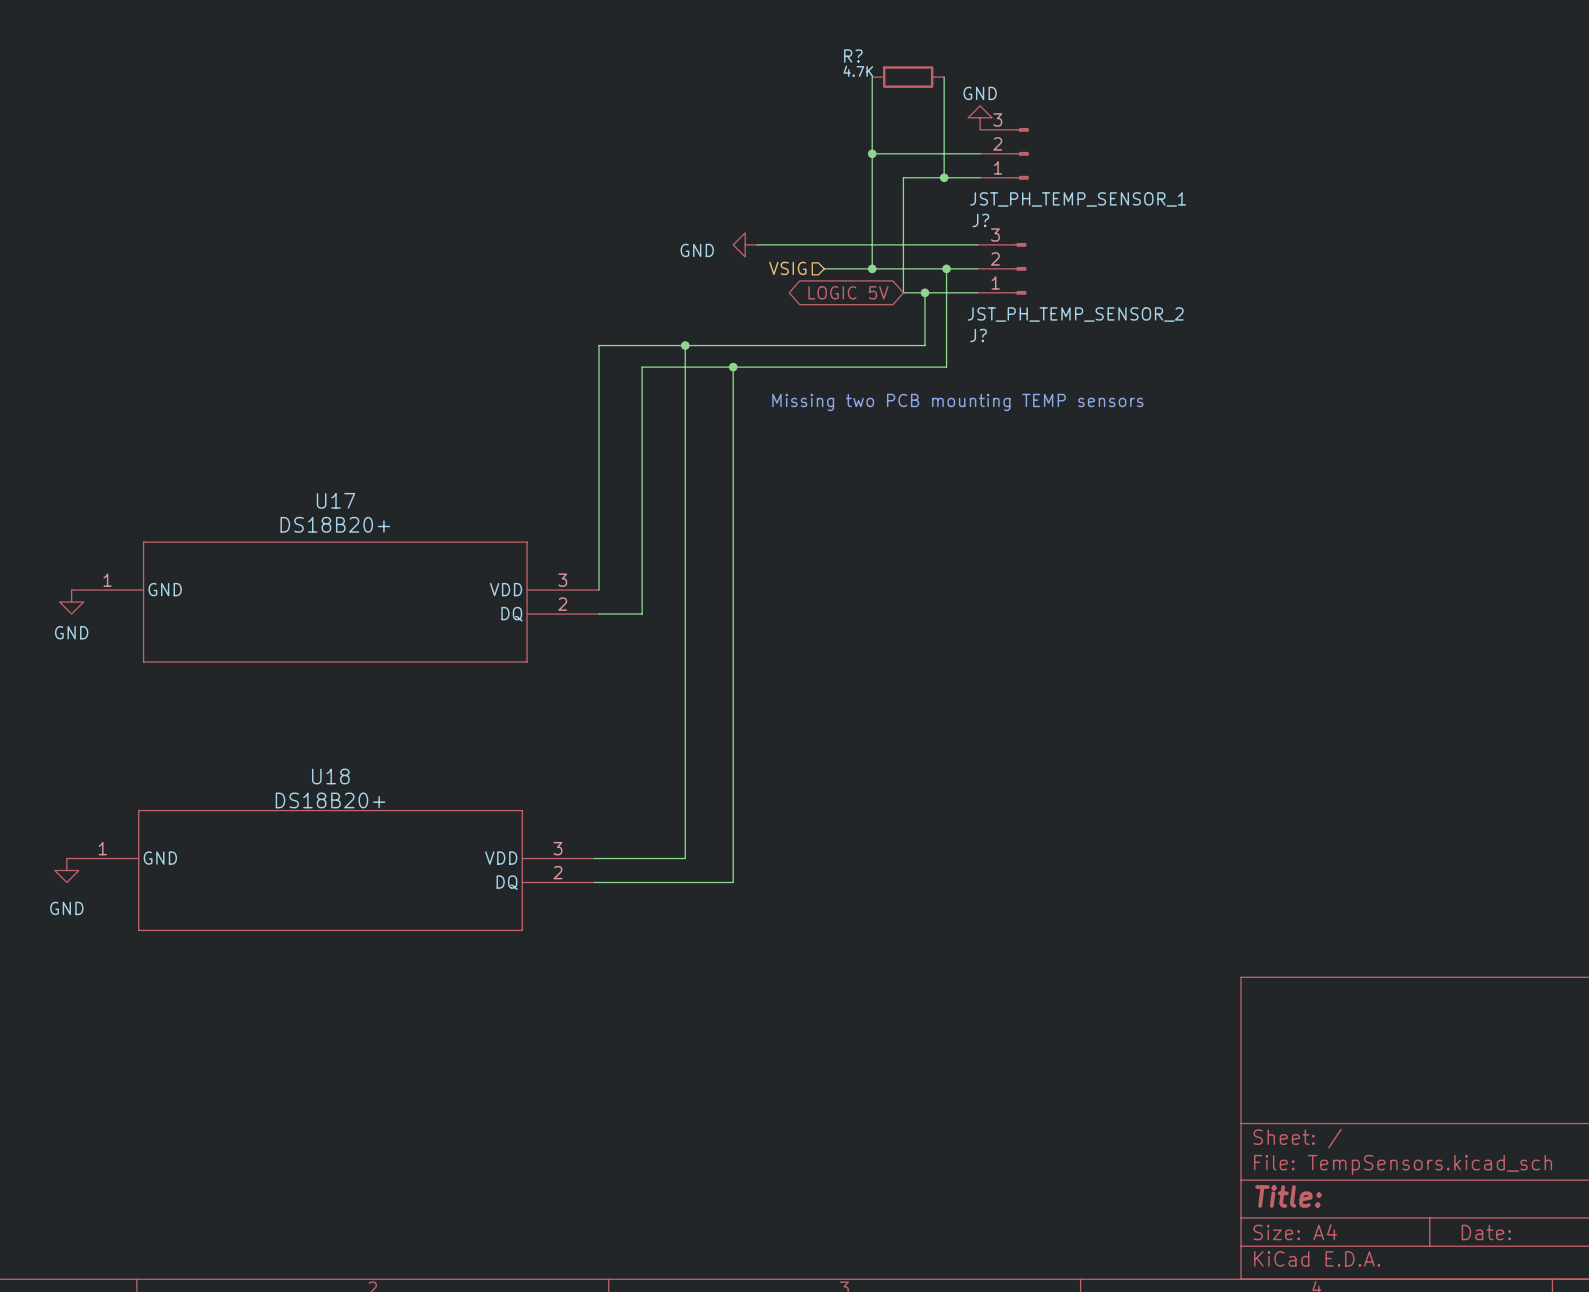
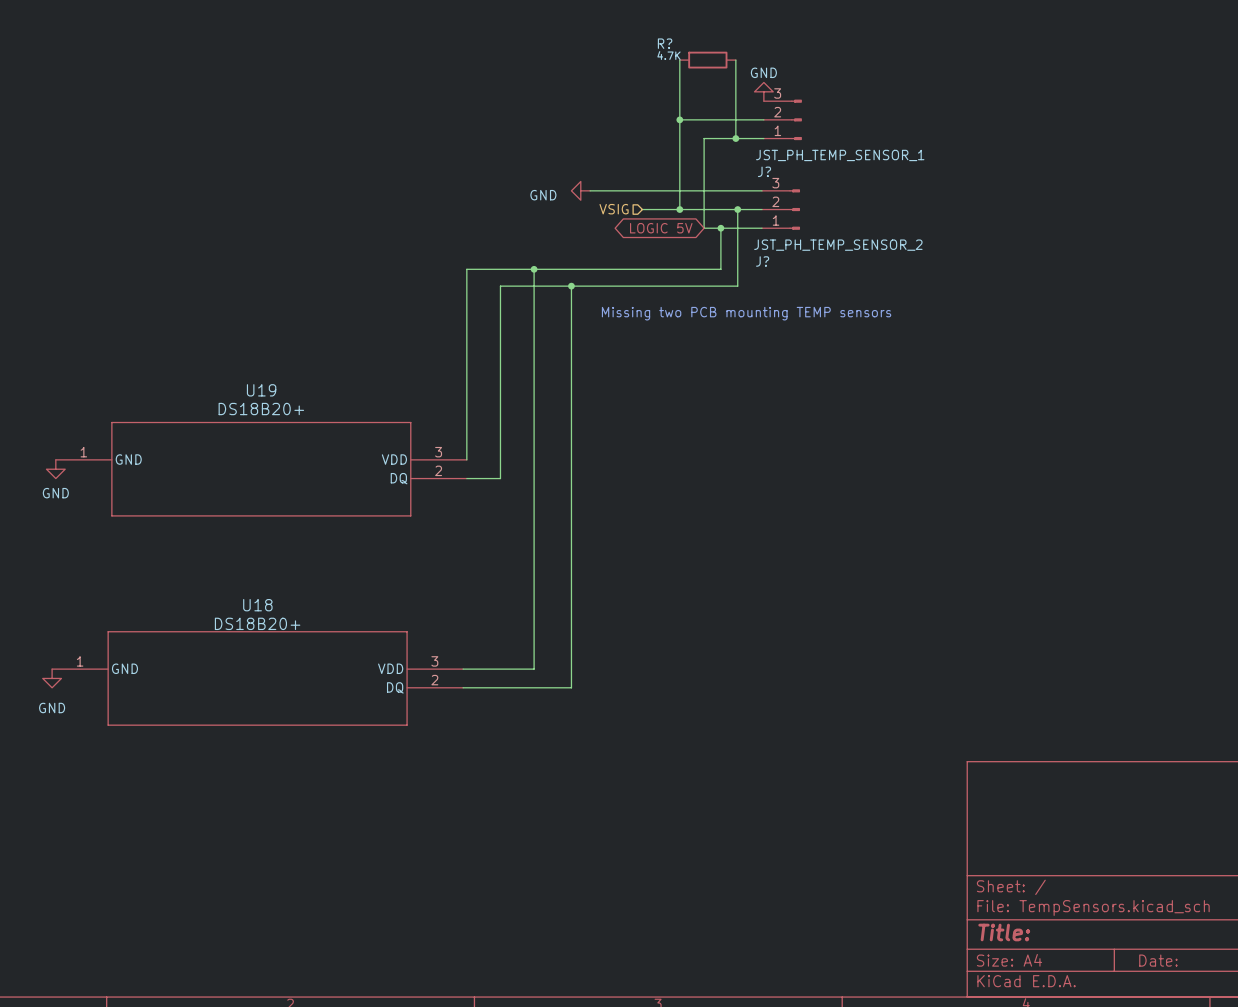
U17 name: U17 (335, 500) -> U19 (261, 390)

